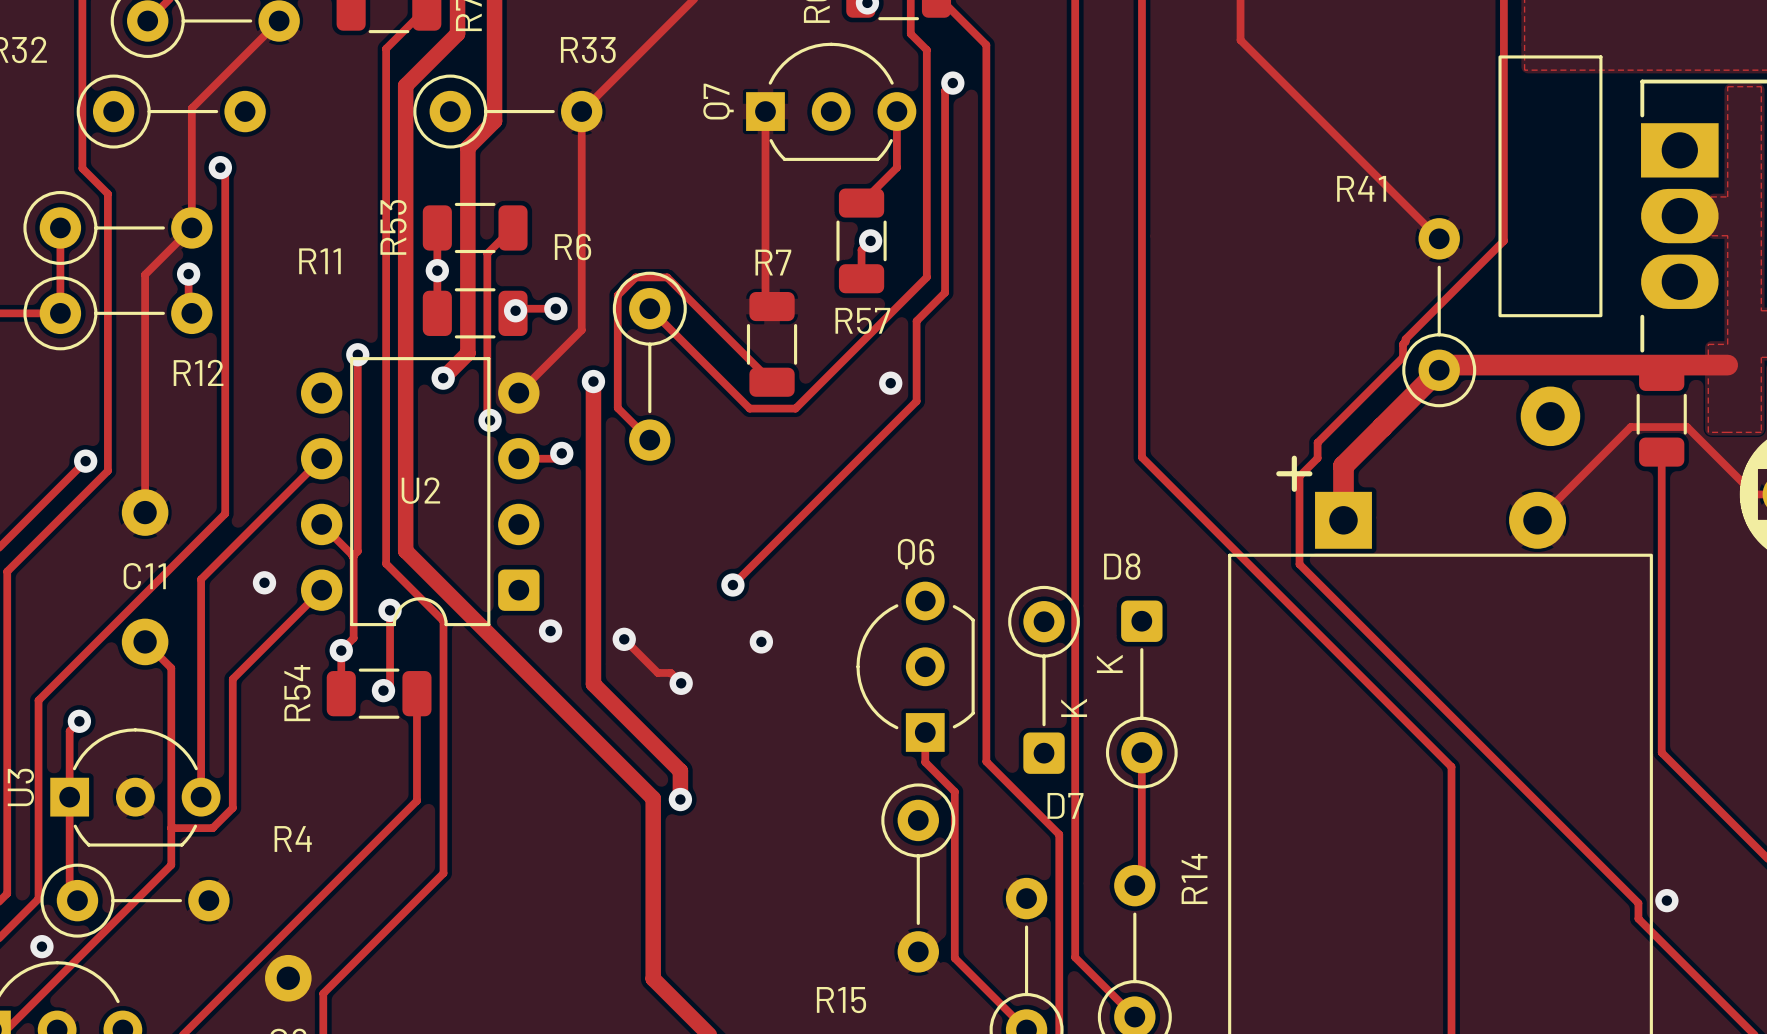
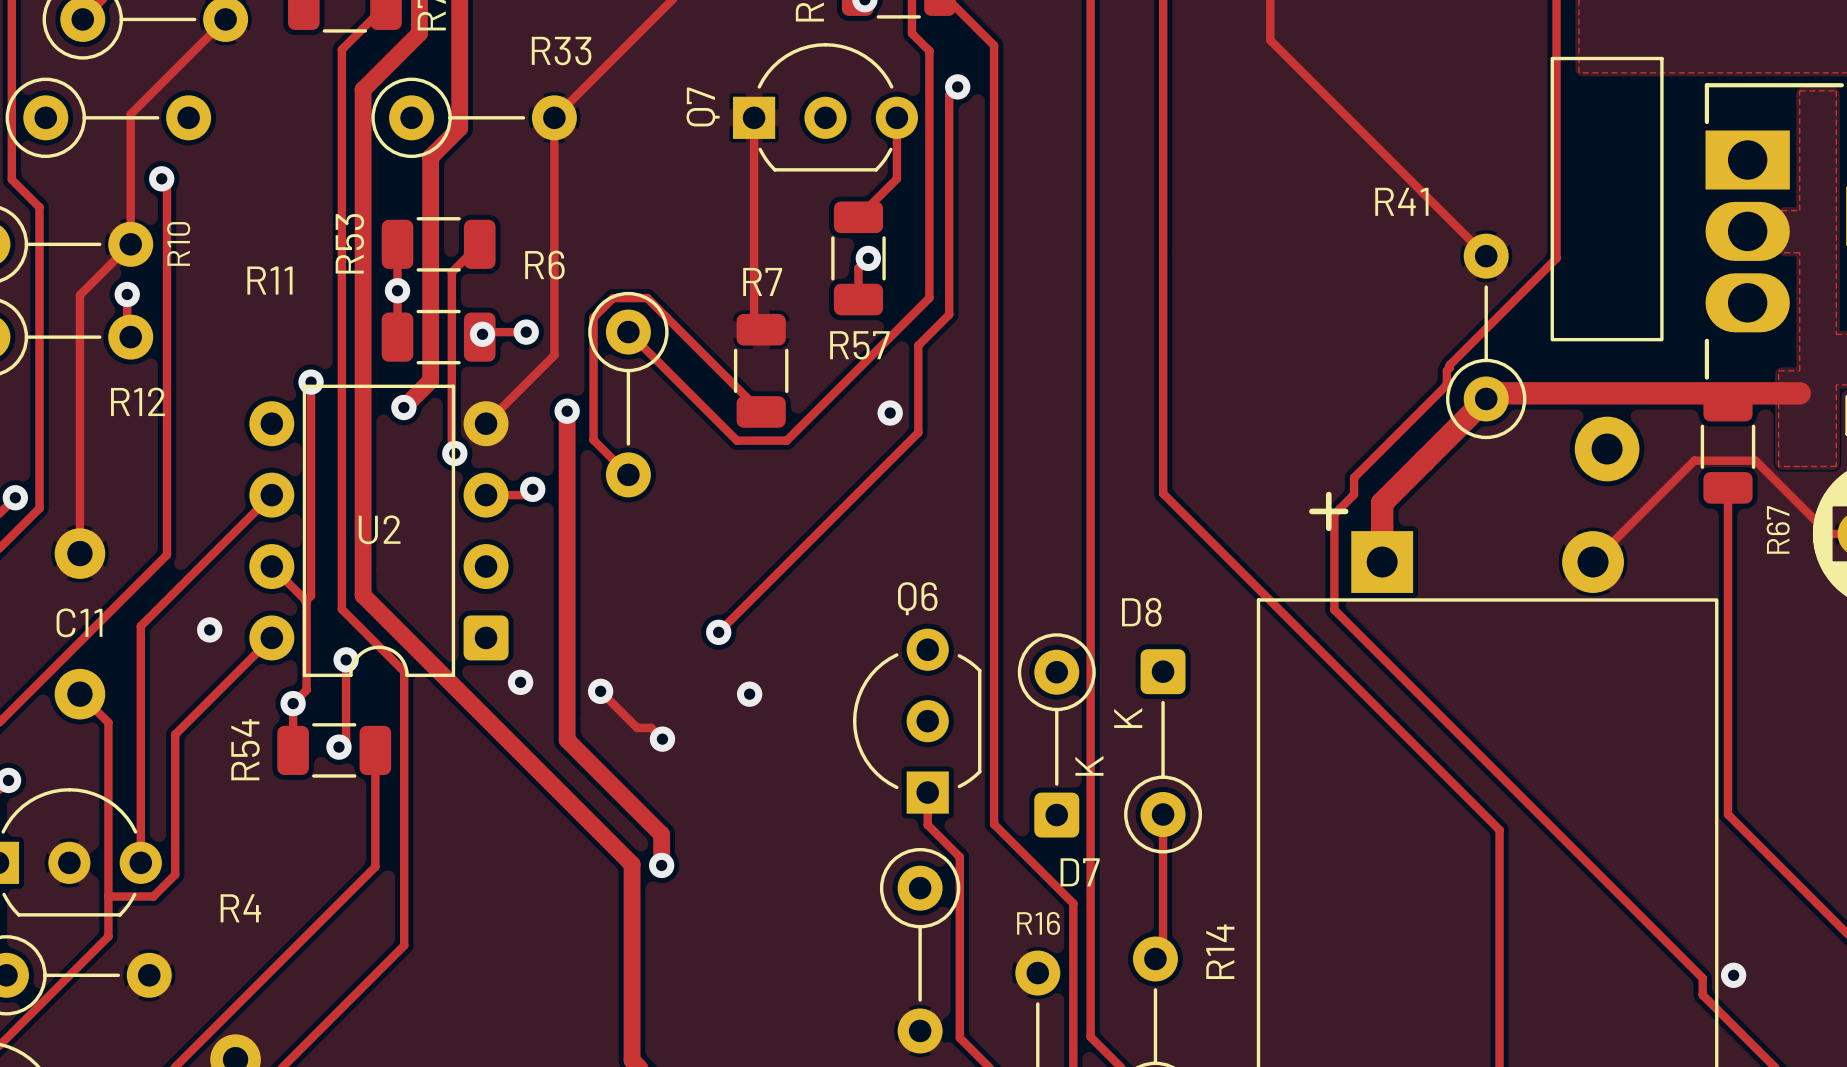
R10 name: none -> R10 (178, 243)
R67 name: none -> R67 (1778, 529)
R16 name: none -> R16 (1038, 923)

